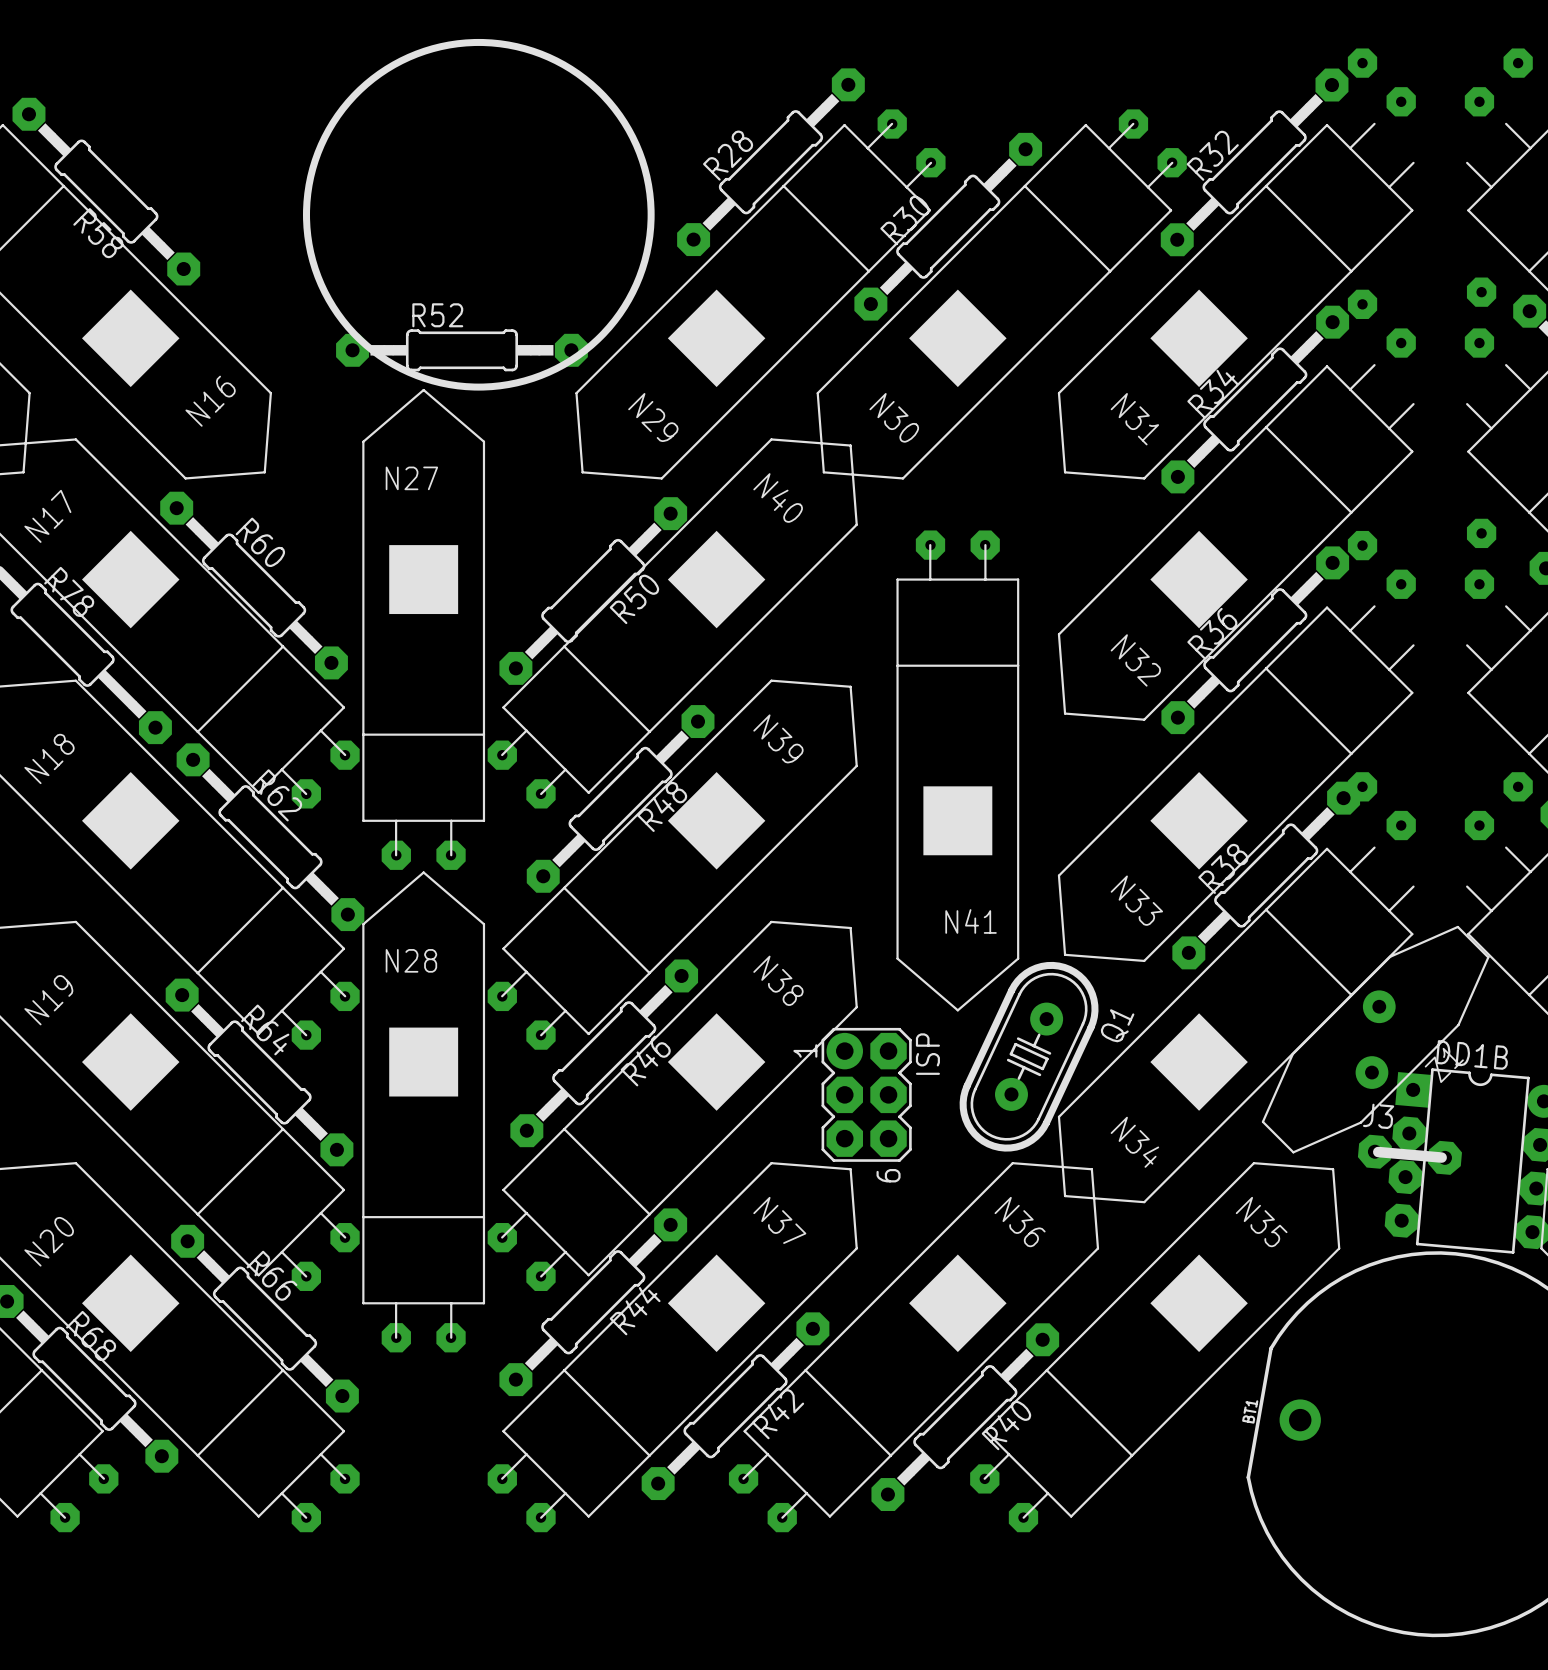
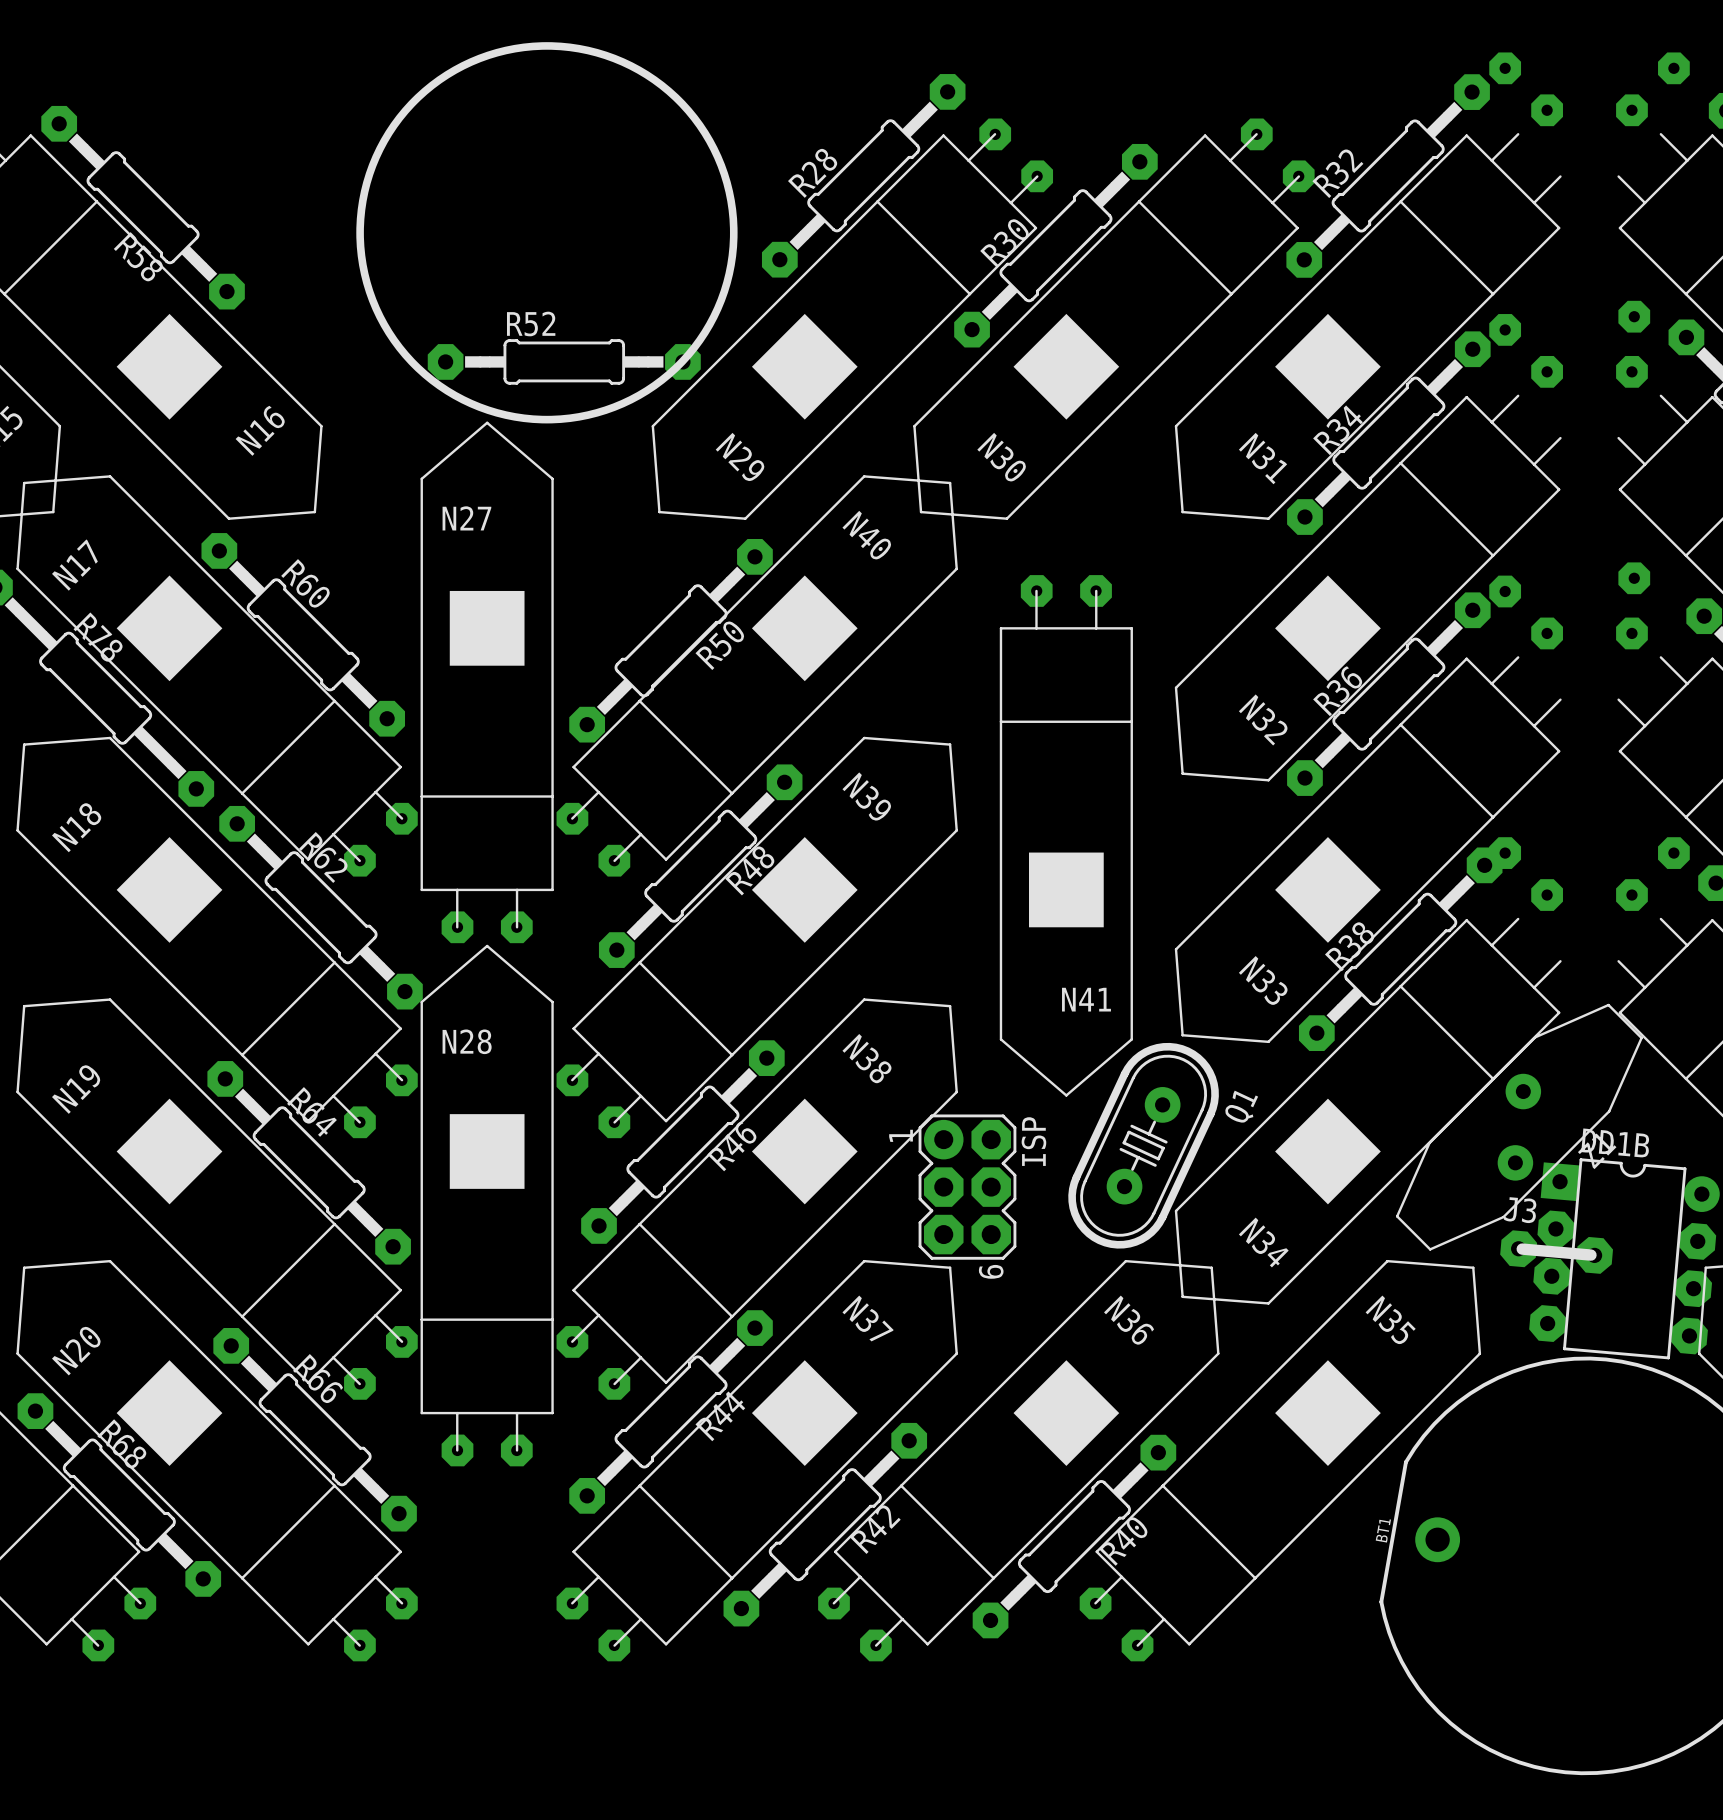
R52 position: (461, 350) -> (564, 361)

